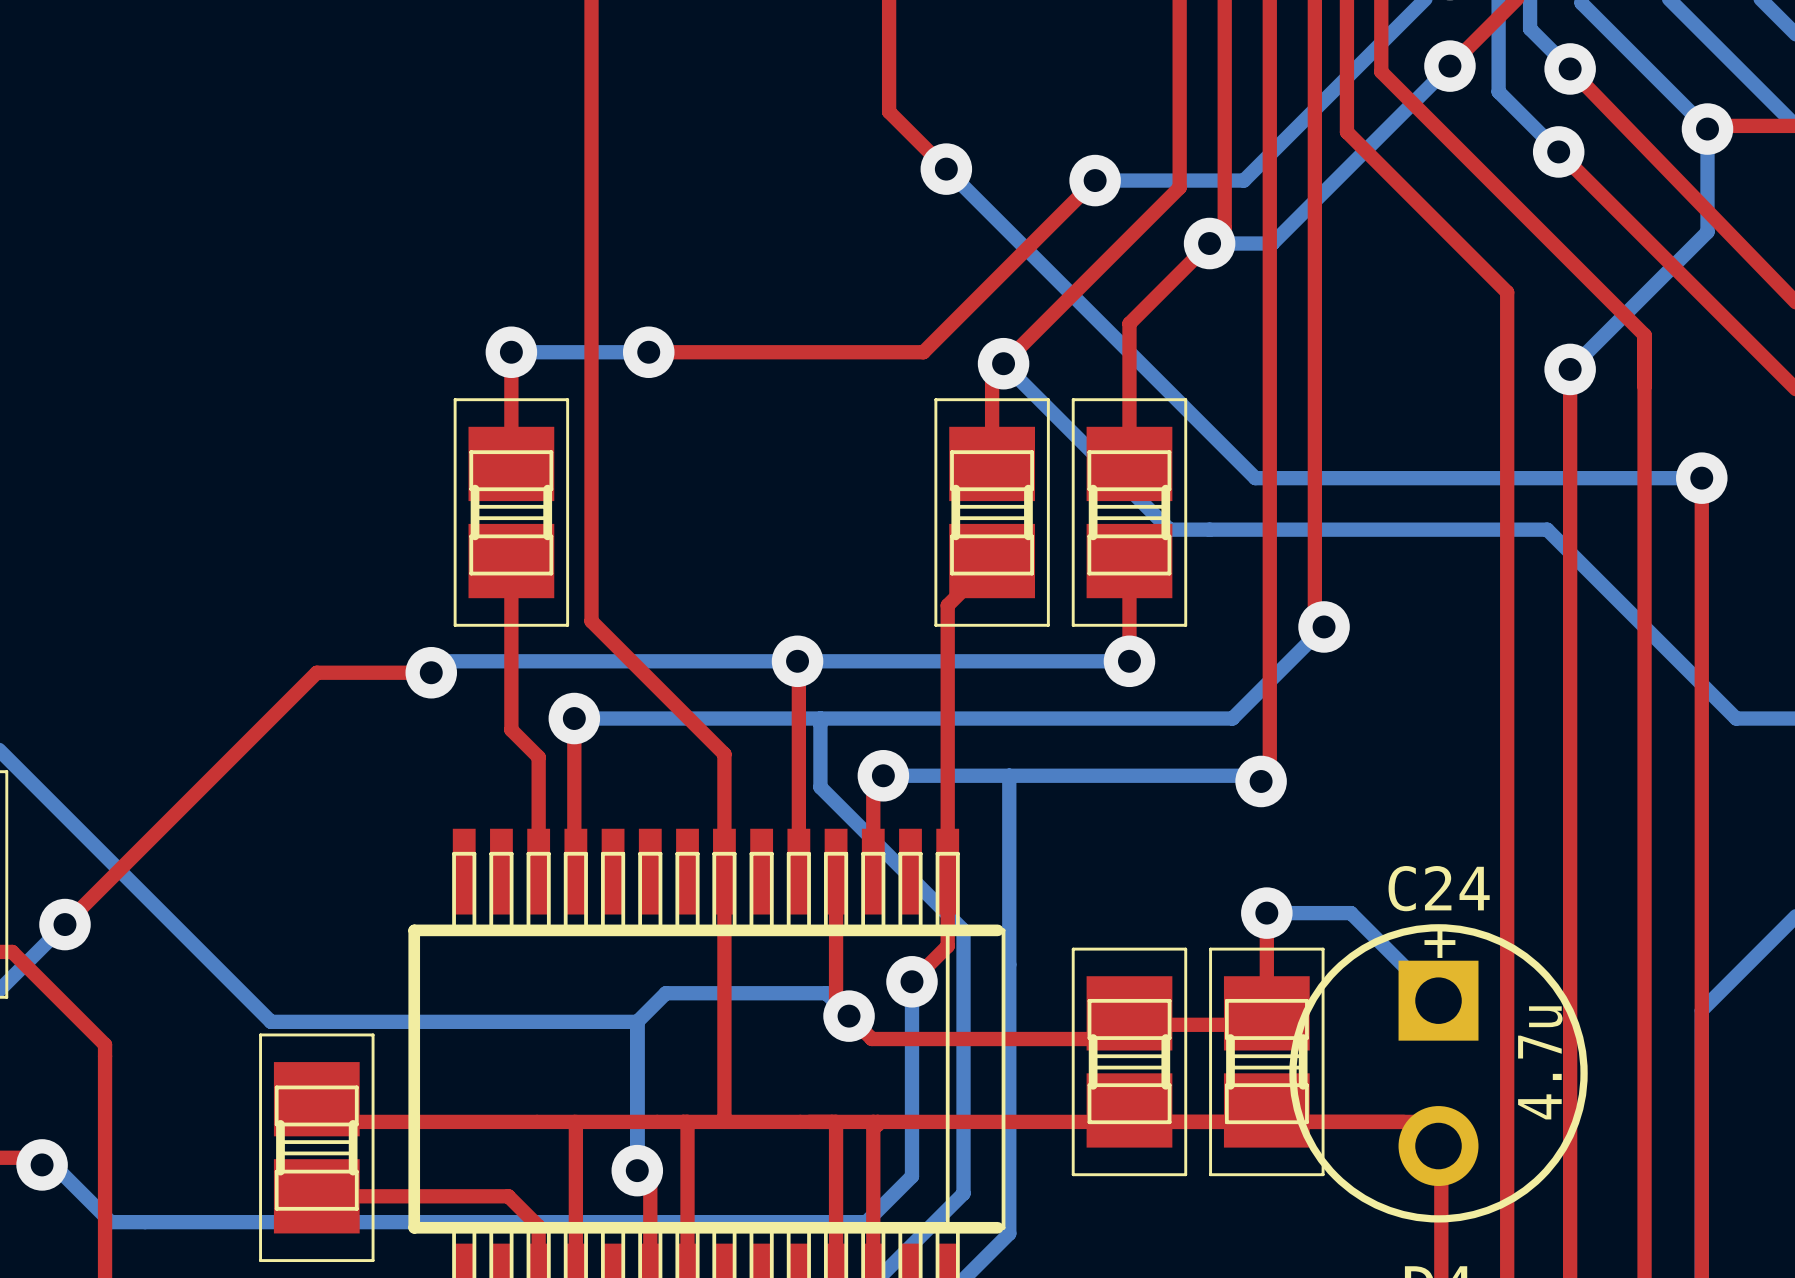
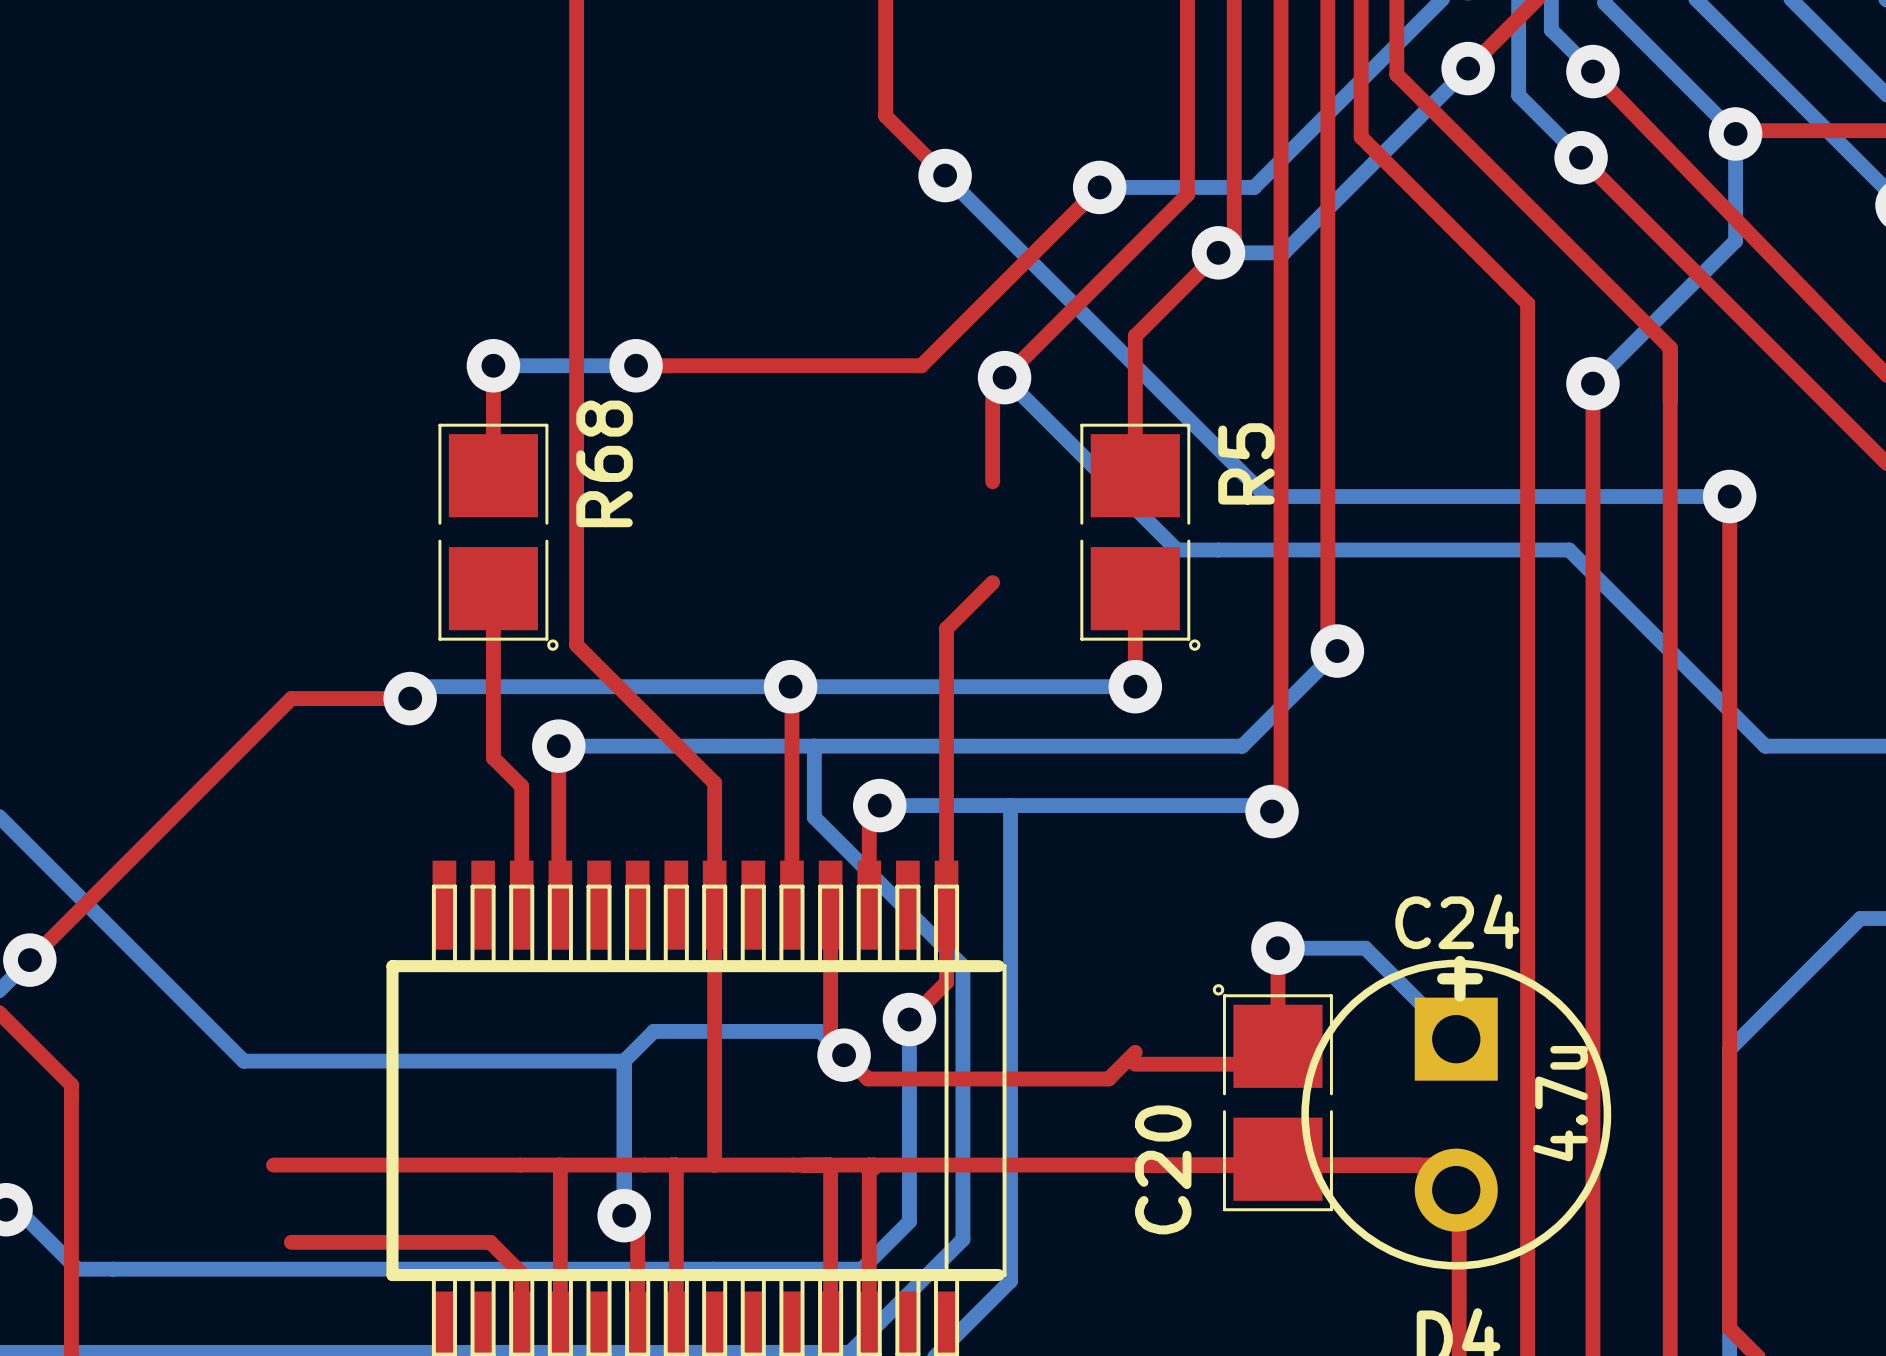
part: (511, 512) -> none
part: (992, 512) -> none
part: (1129, 512) -> none
R68: none -> (498, 537)
R5: none -> (1140, 537)
C20: none -> (1272, 1097)
part: (1129, 1061) -> none
part: (1266, 1061) -> none
part: (316, 1147) -> none

